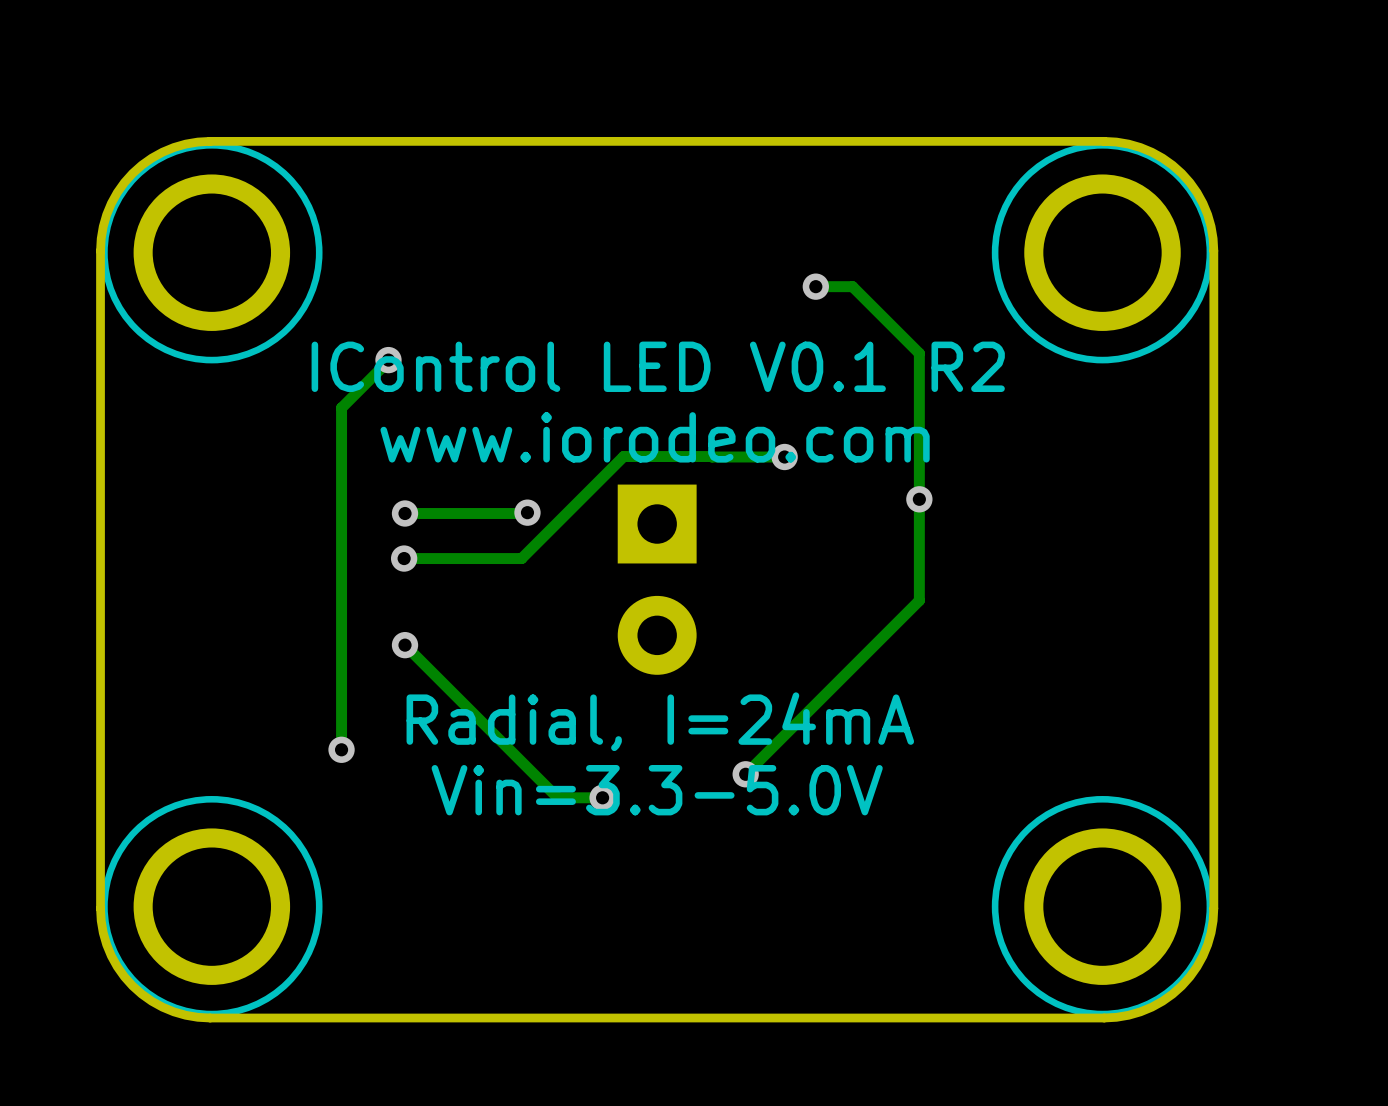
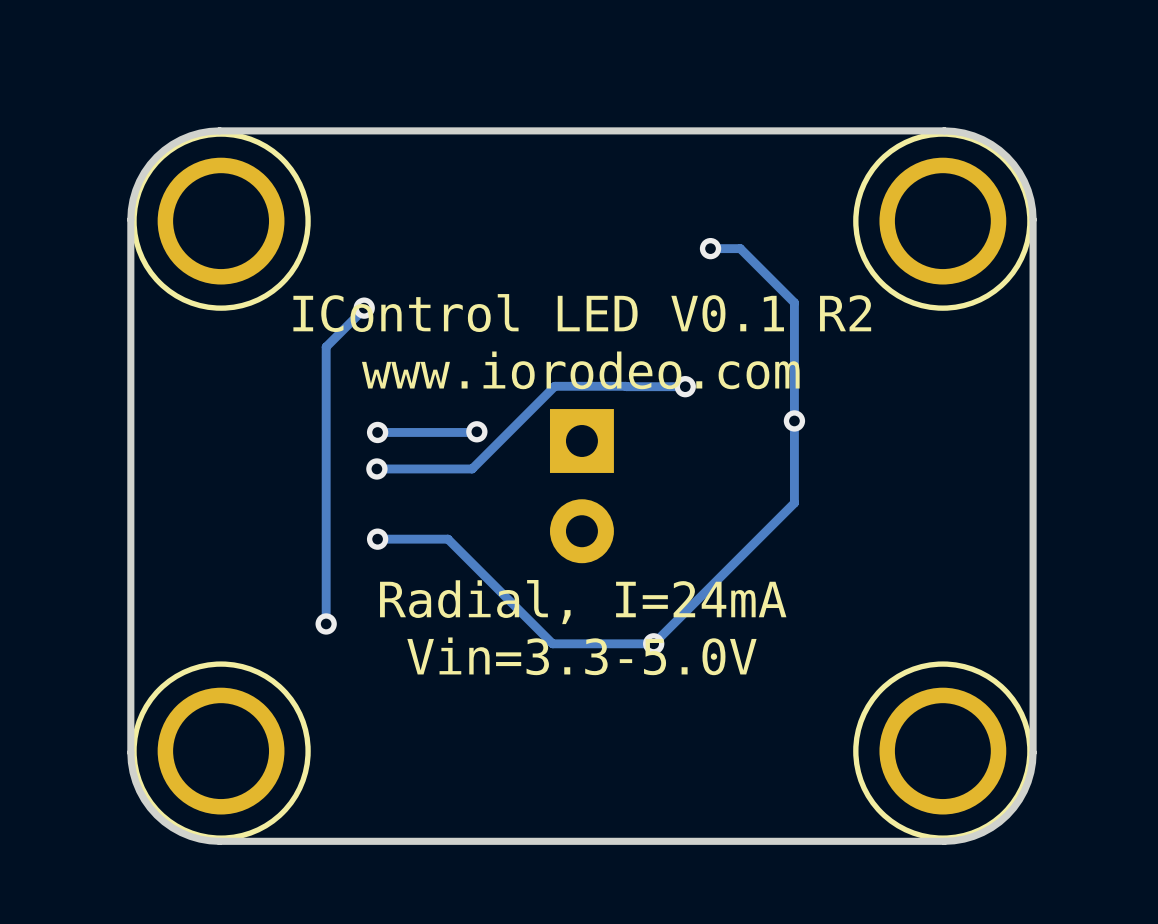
track: (405, 645) (557, 797) (603, 796) -> (377, 539) (447, 539) (552, 643) (653, 643)
via: (602, 797) -> none

